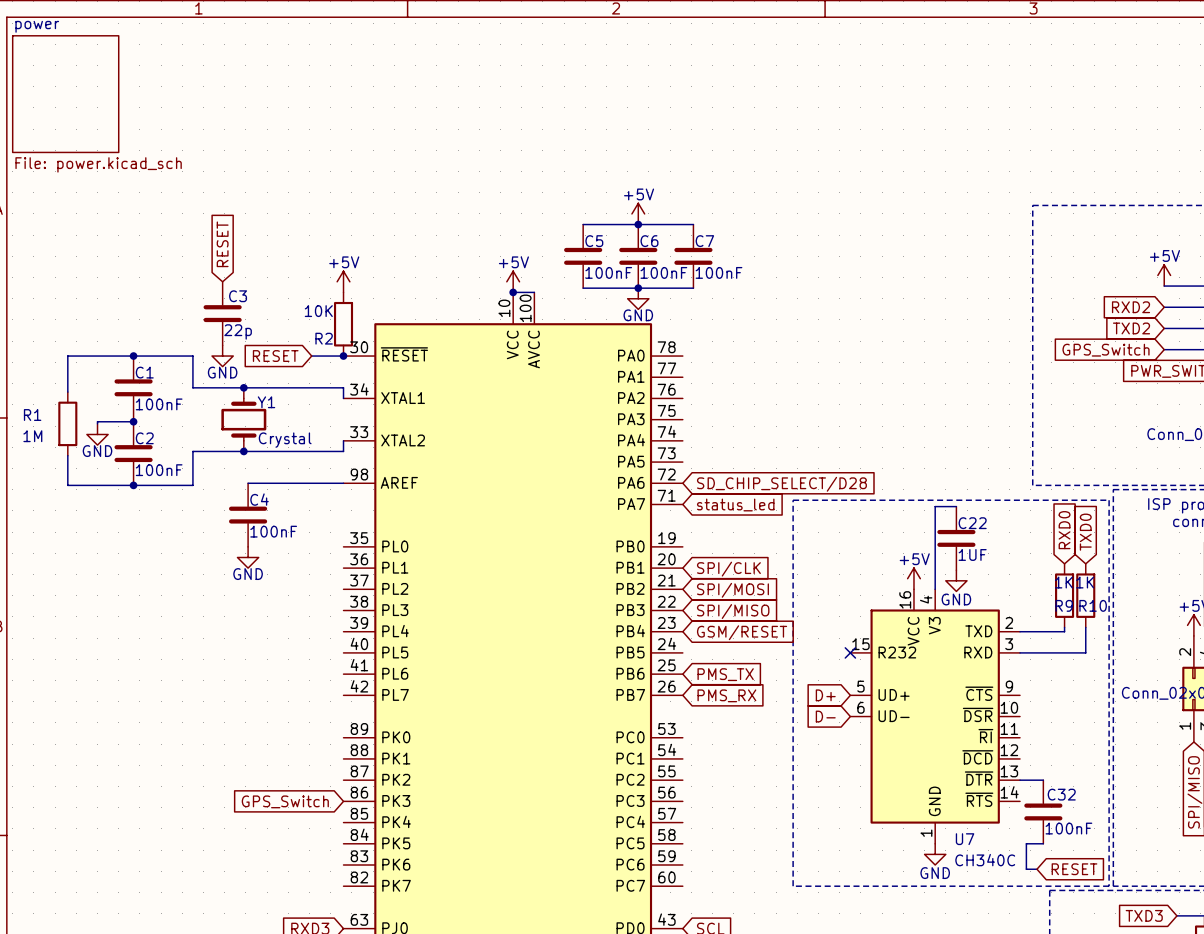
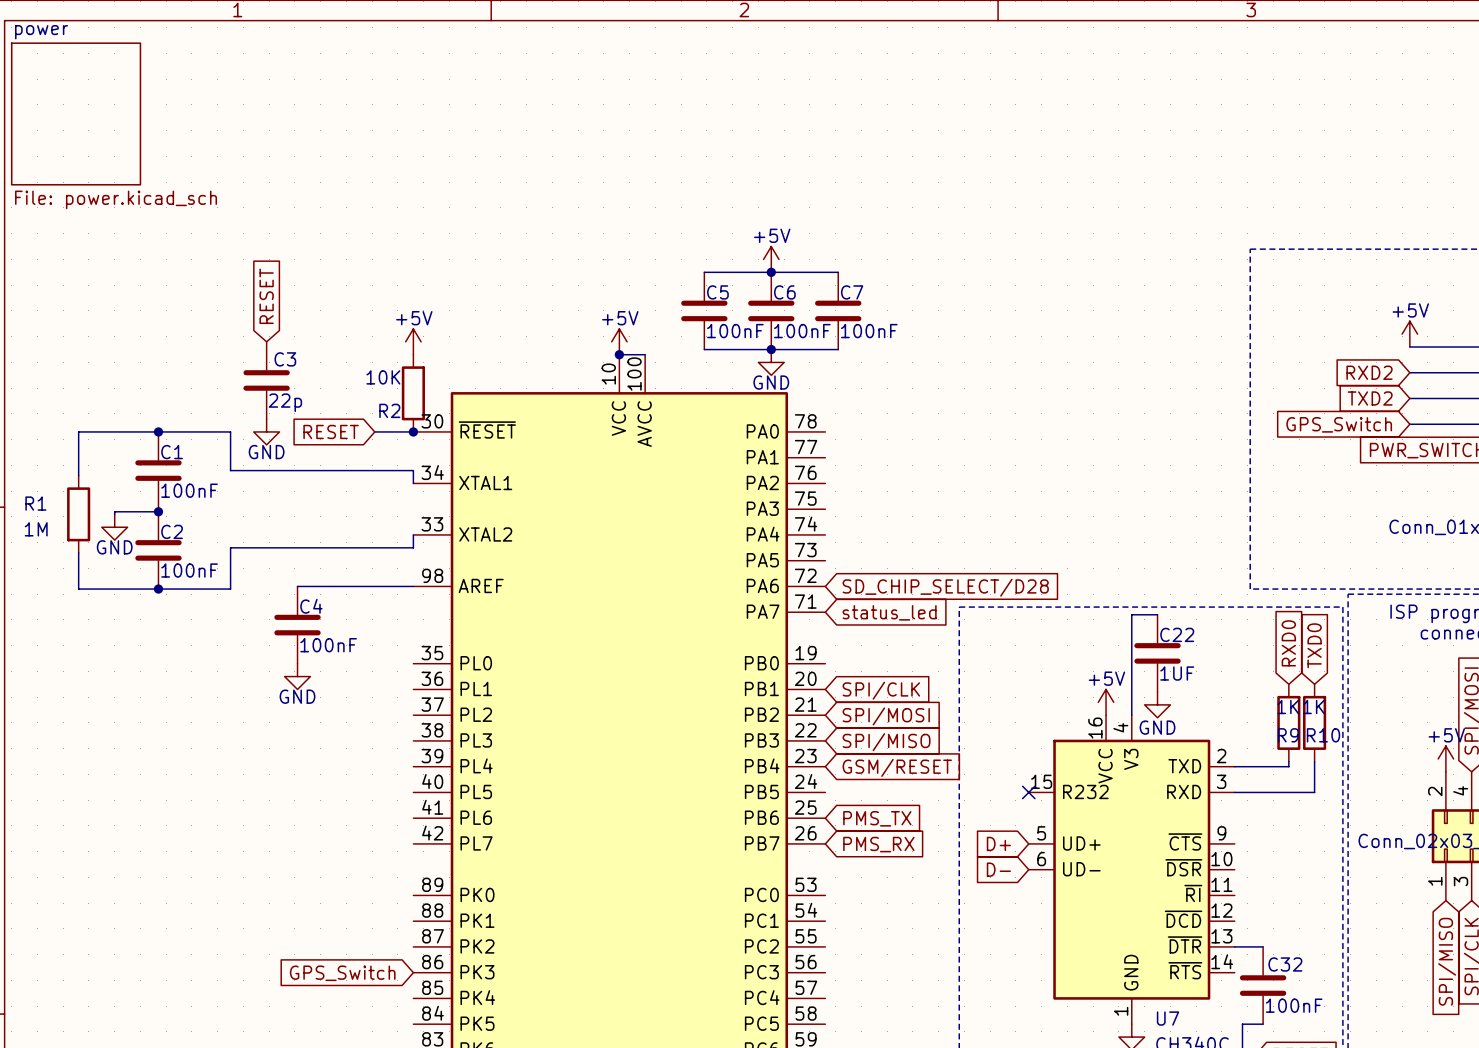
junction: (243, 387) -> none
Y1: Crystal (243, 419) -> none
junction: (243, 451) -> none

